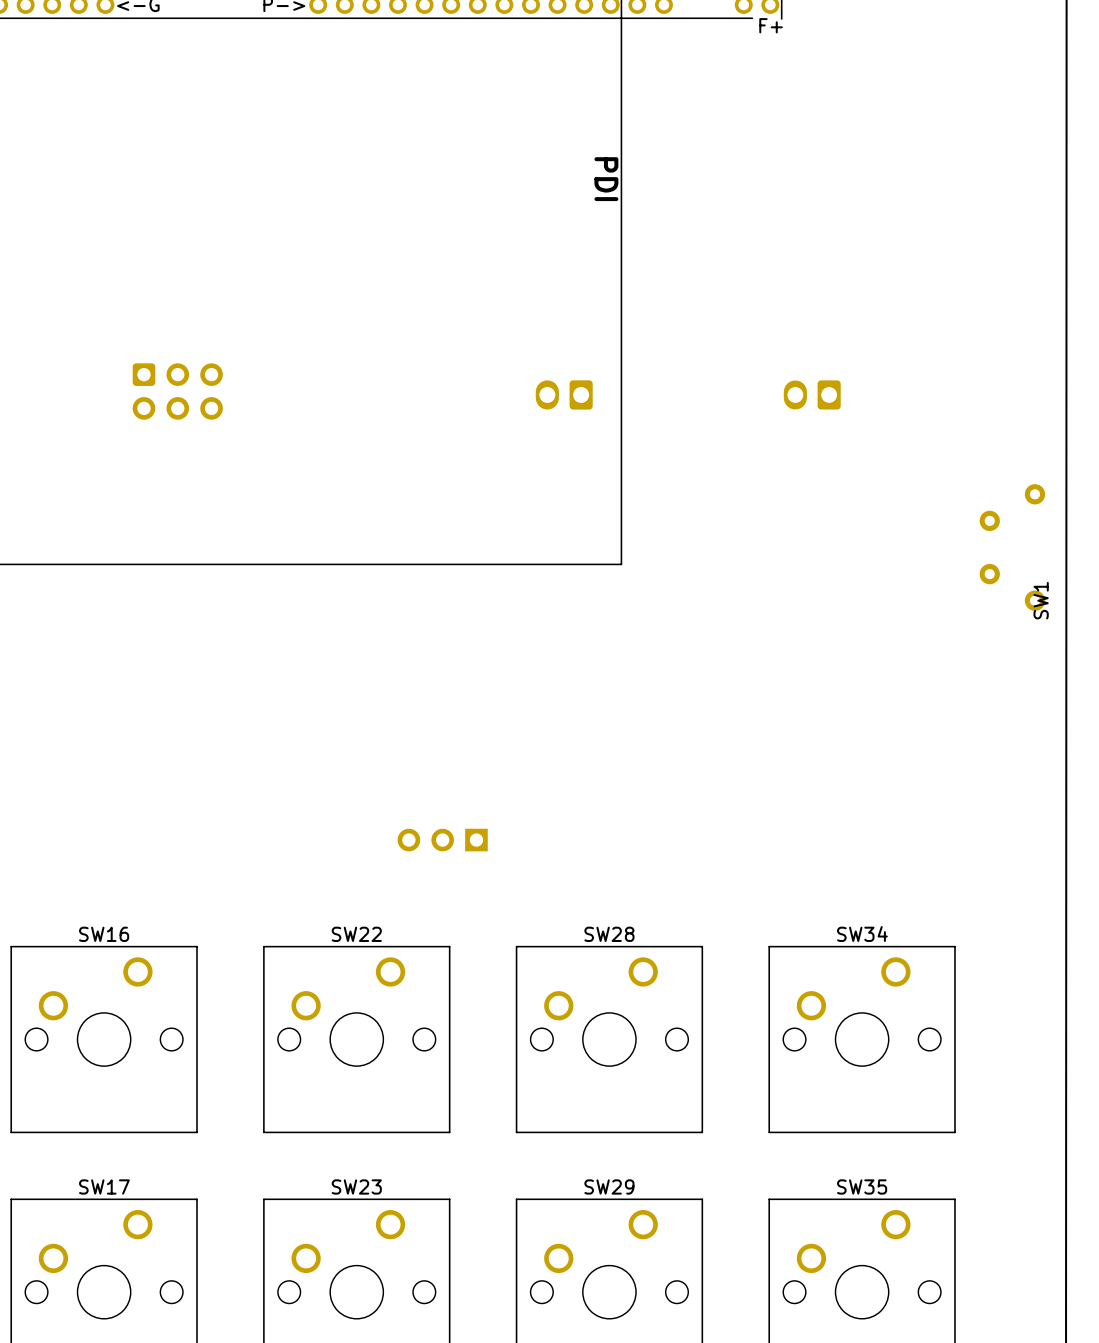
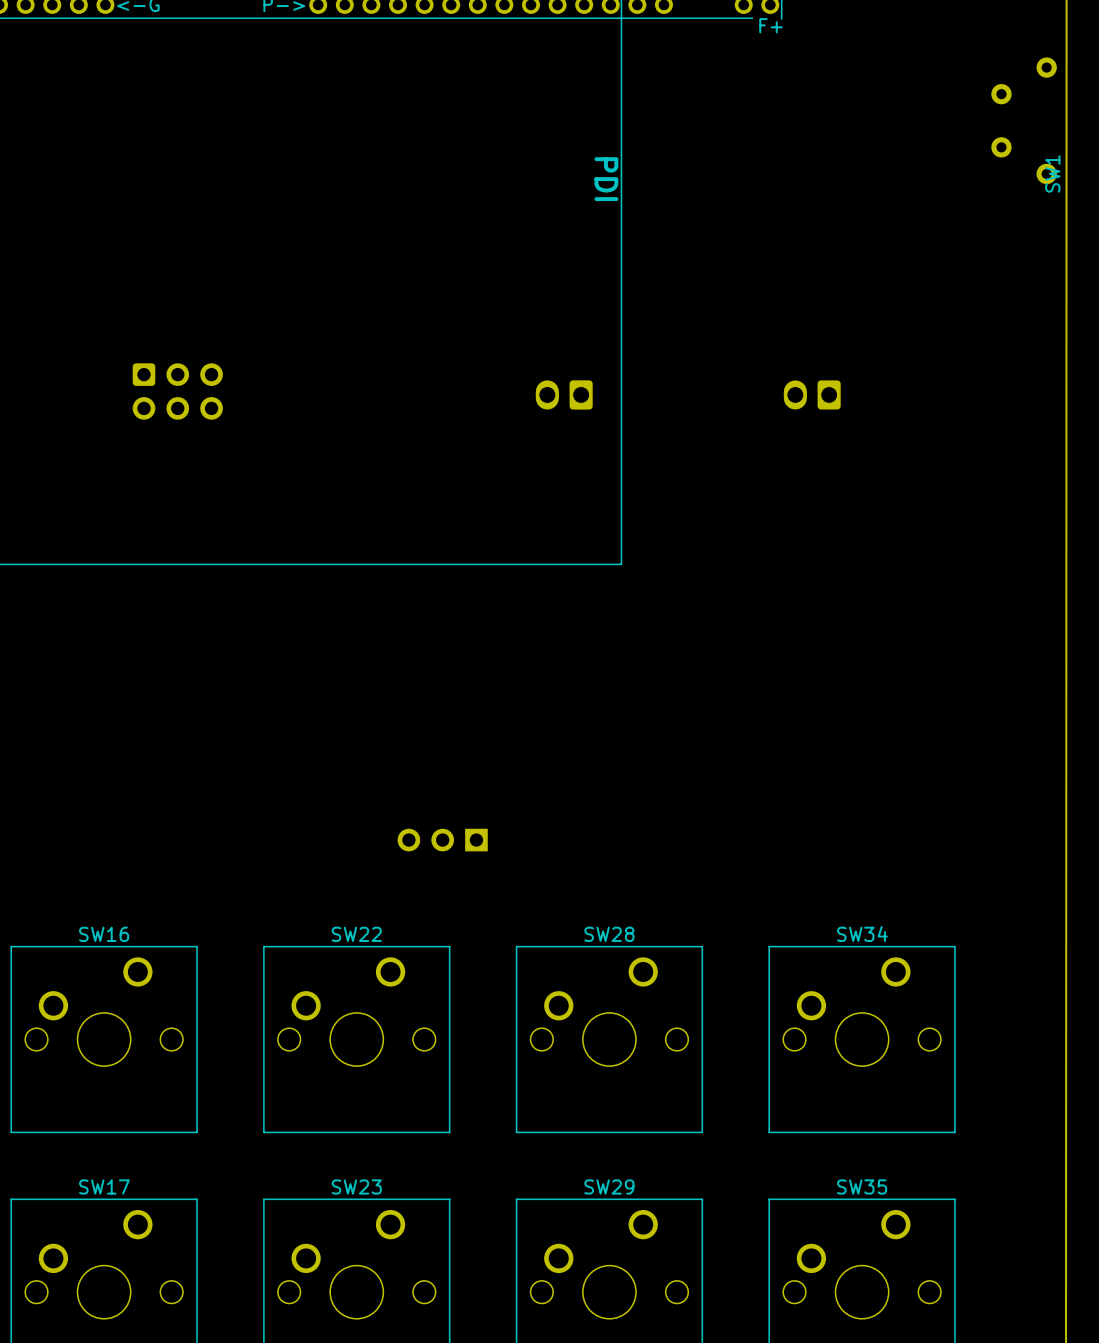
SW1 position: (1012, 547) -> (1024, 120)

